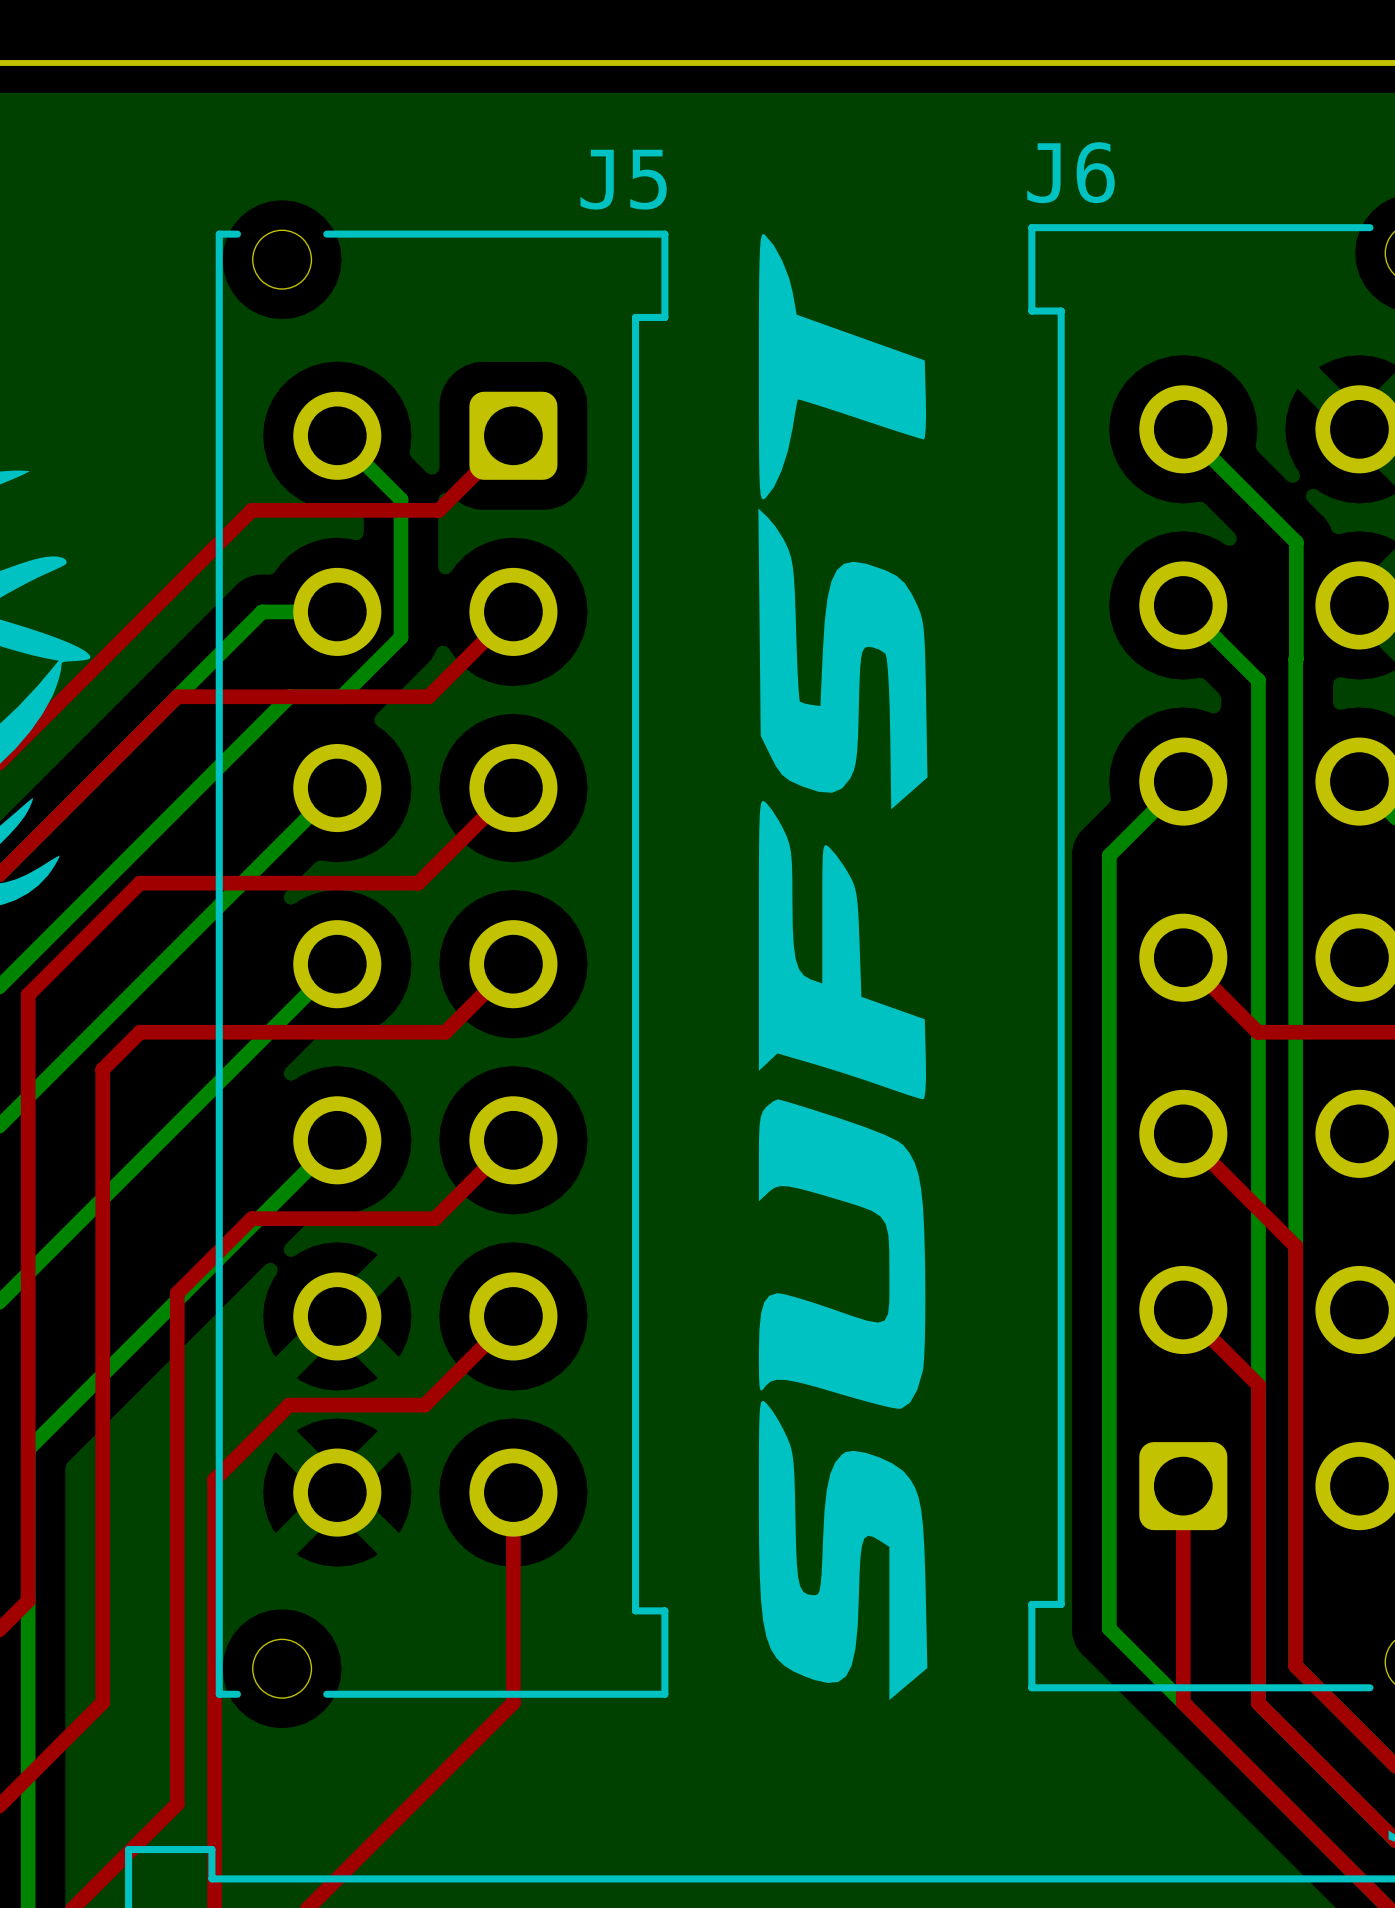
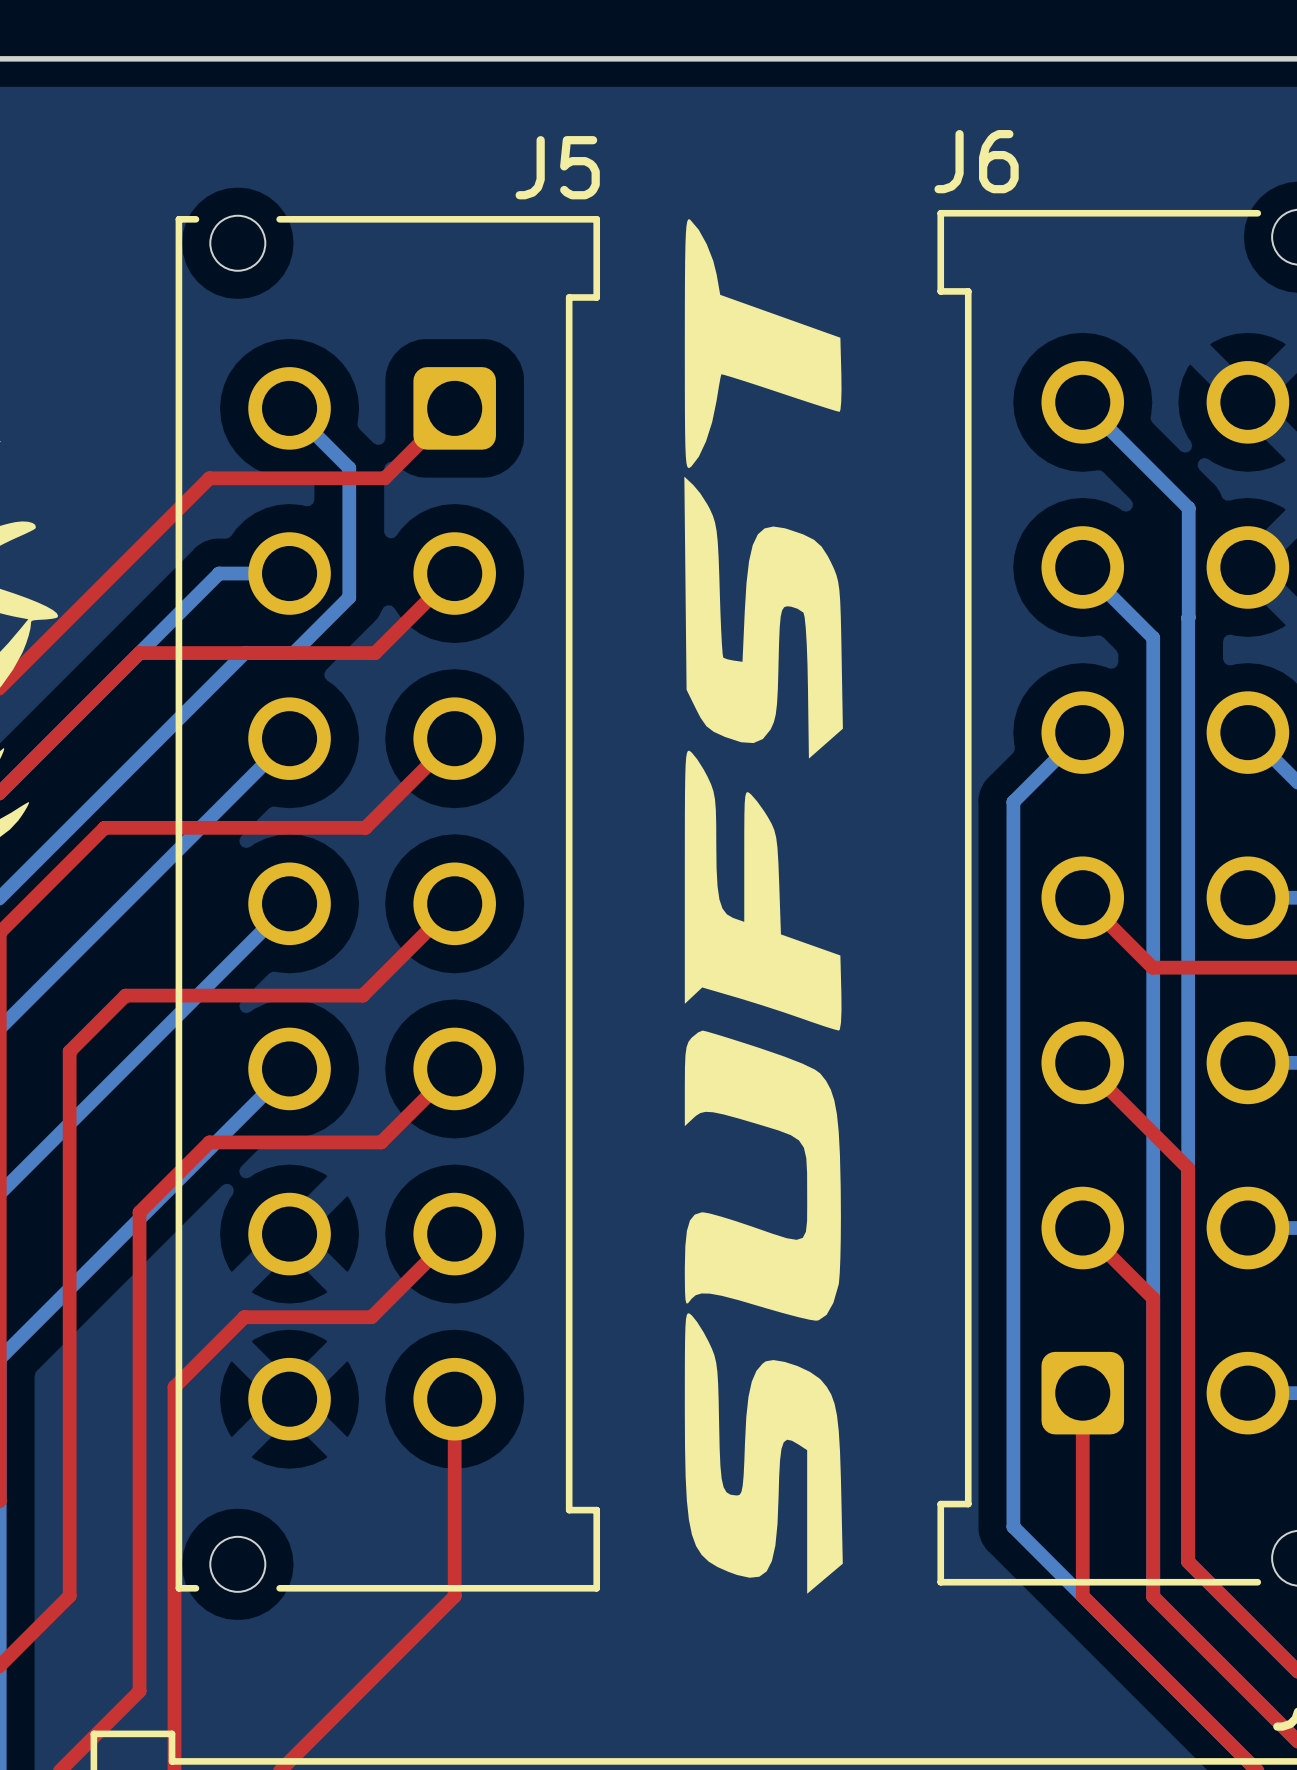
top track: (445, 1032) (140, 1032) (102, 1069) (102, 1121) -> (390, 967) (362, 995) (125, 995) (69, 1051)

